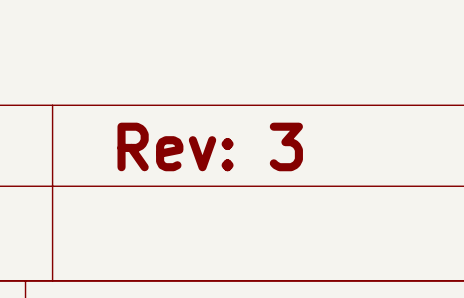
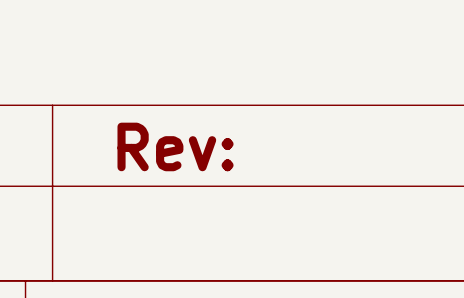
title block: Rev: 3 (210, 146) -> Rev: (175, 146)

